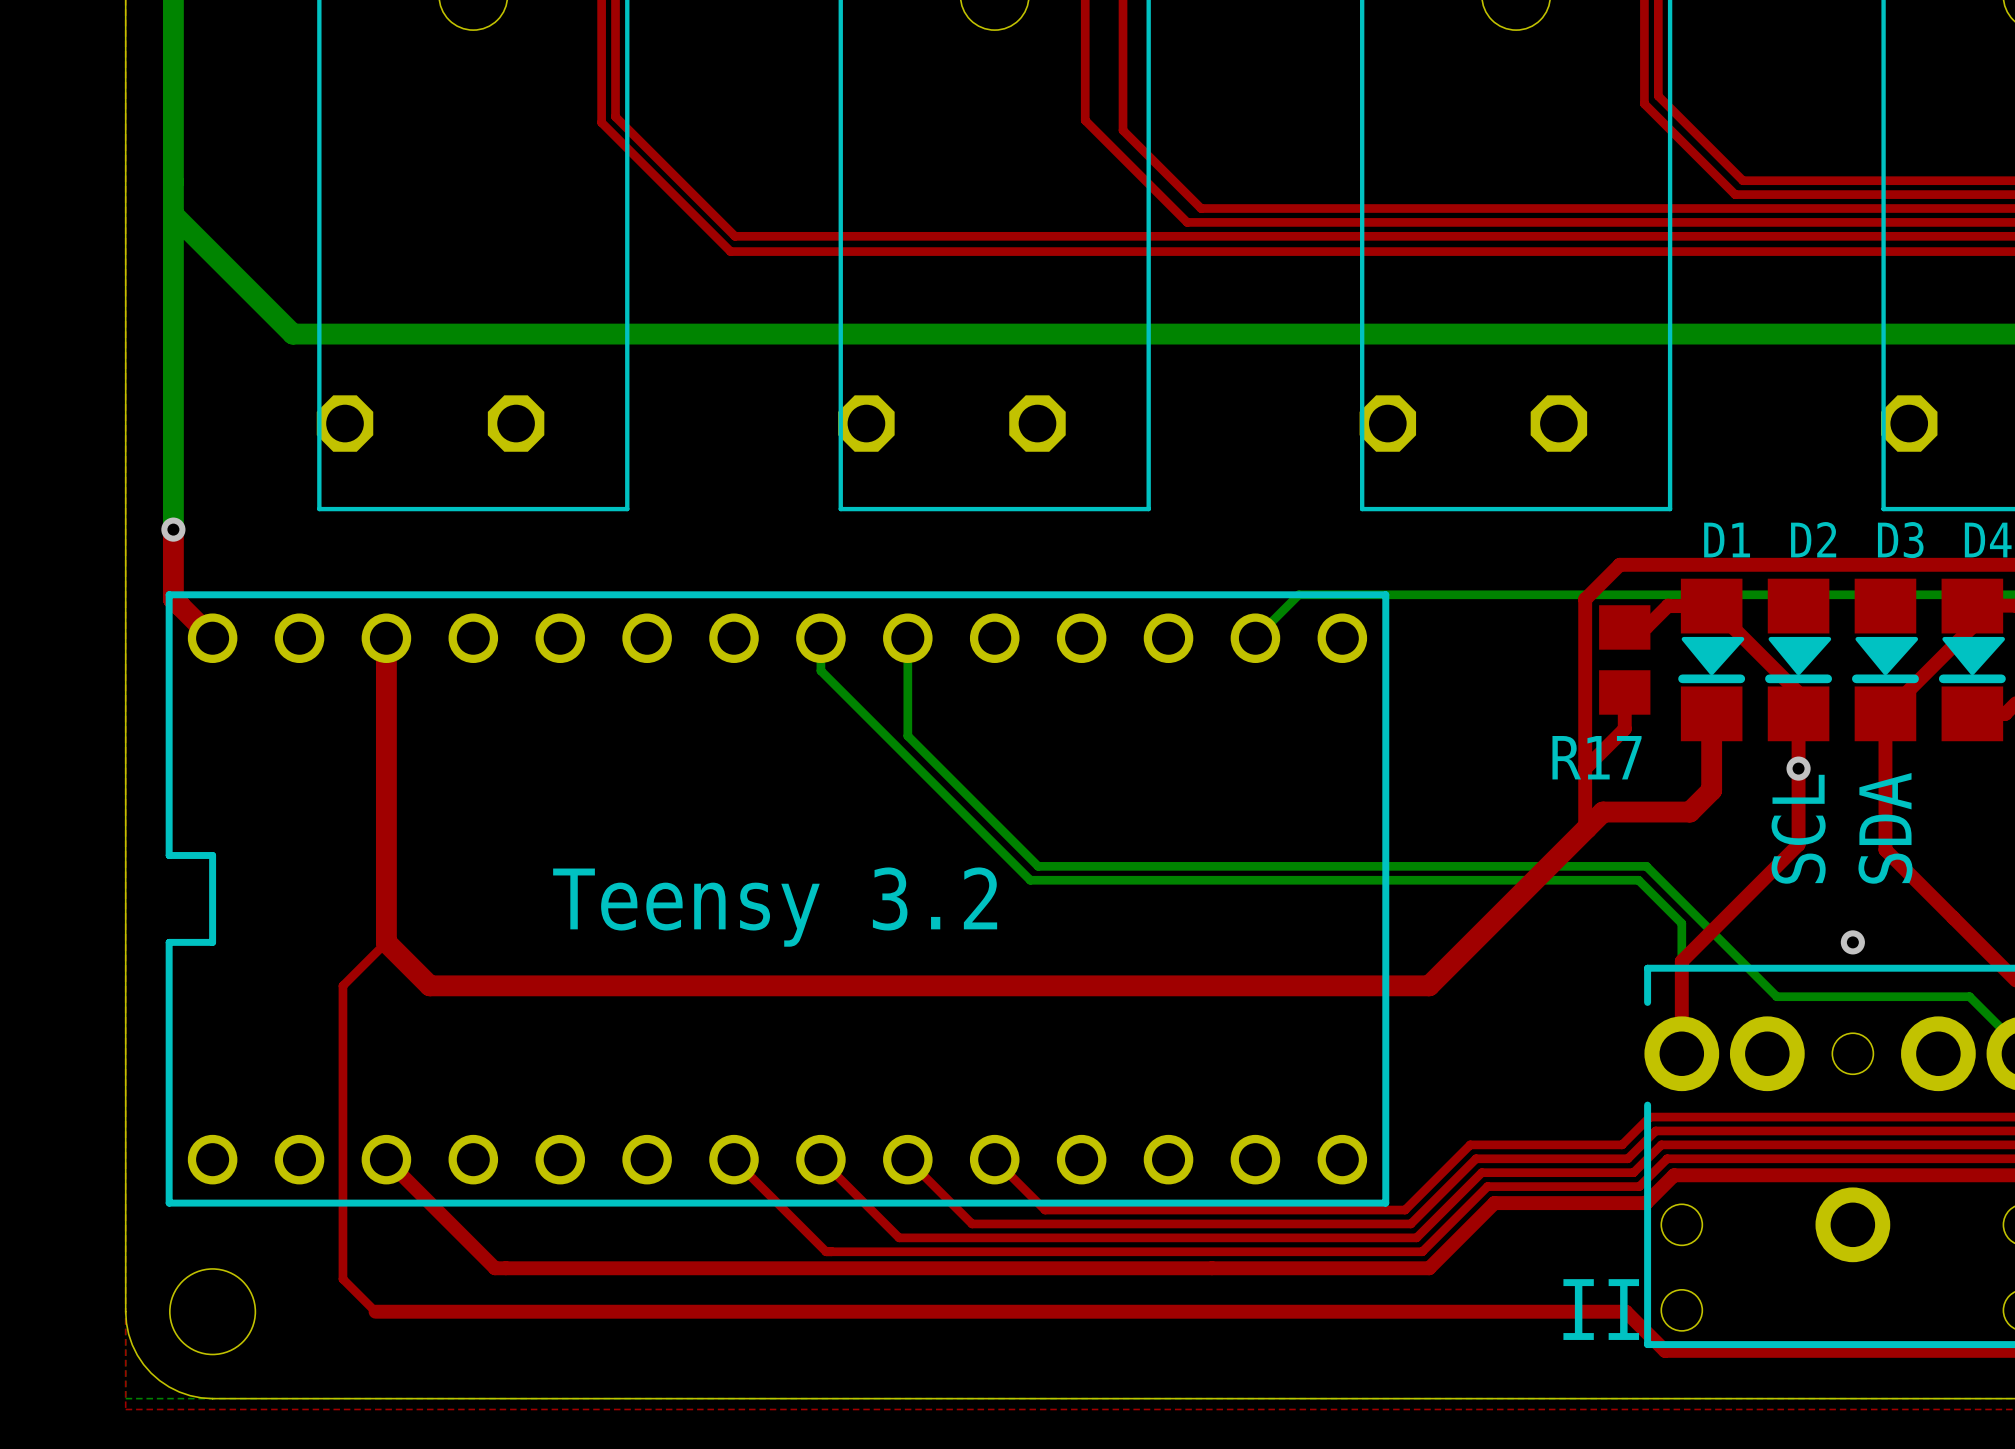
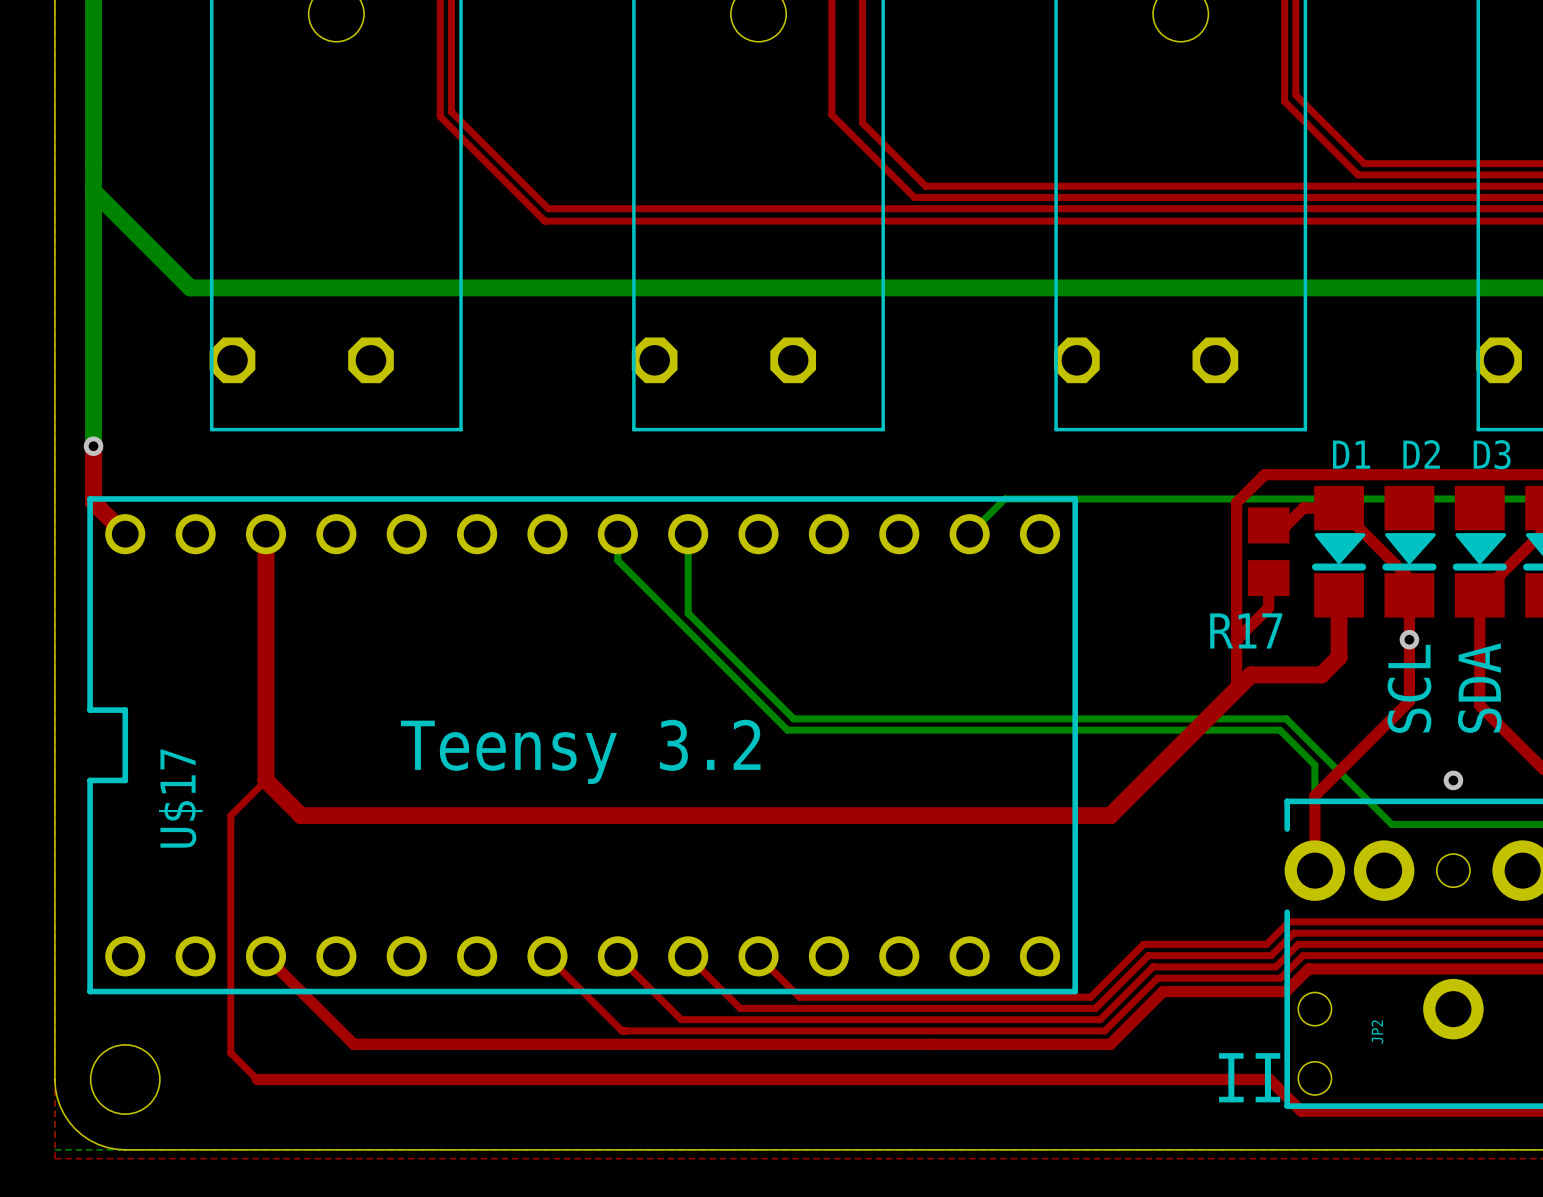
U$17 name: none -> U$17 (180, 798)
JP2 name: none -> JP2 (1377, 1031)

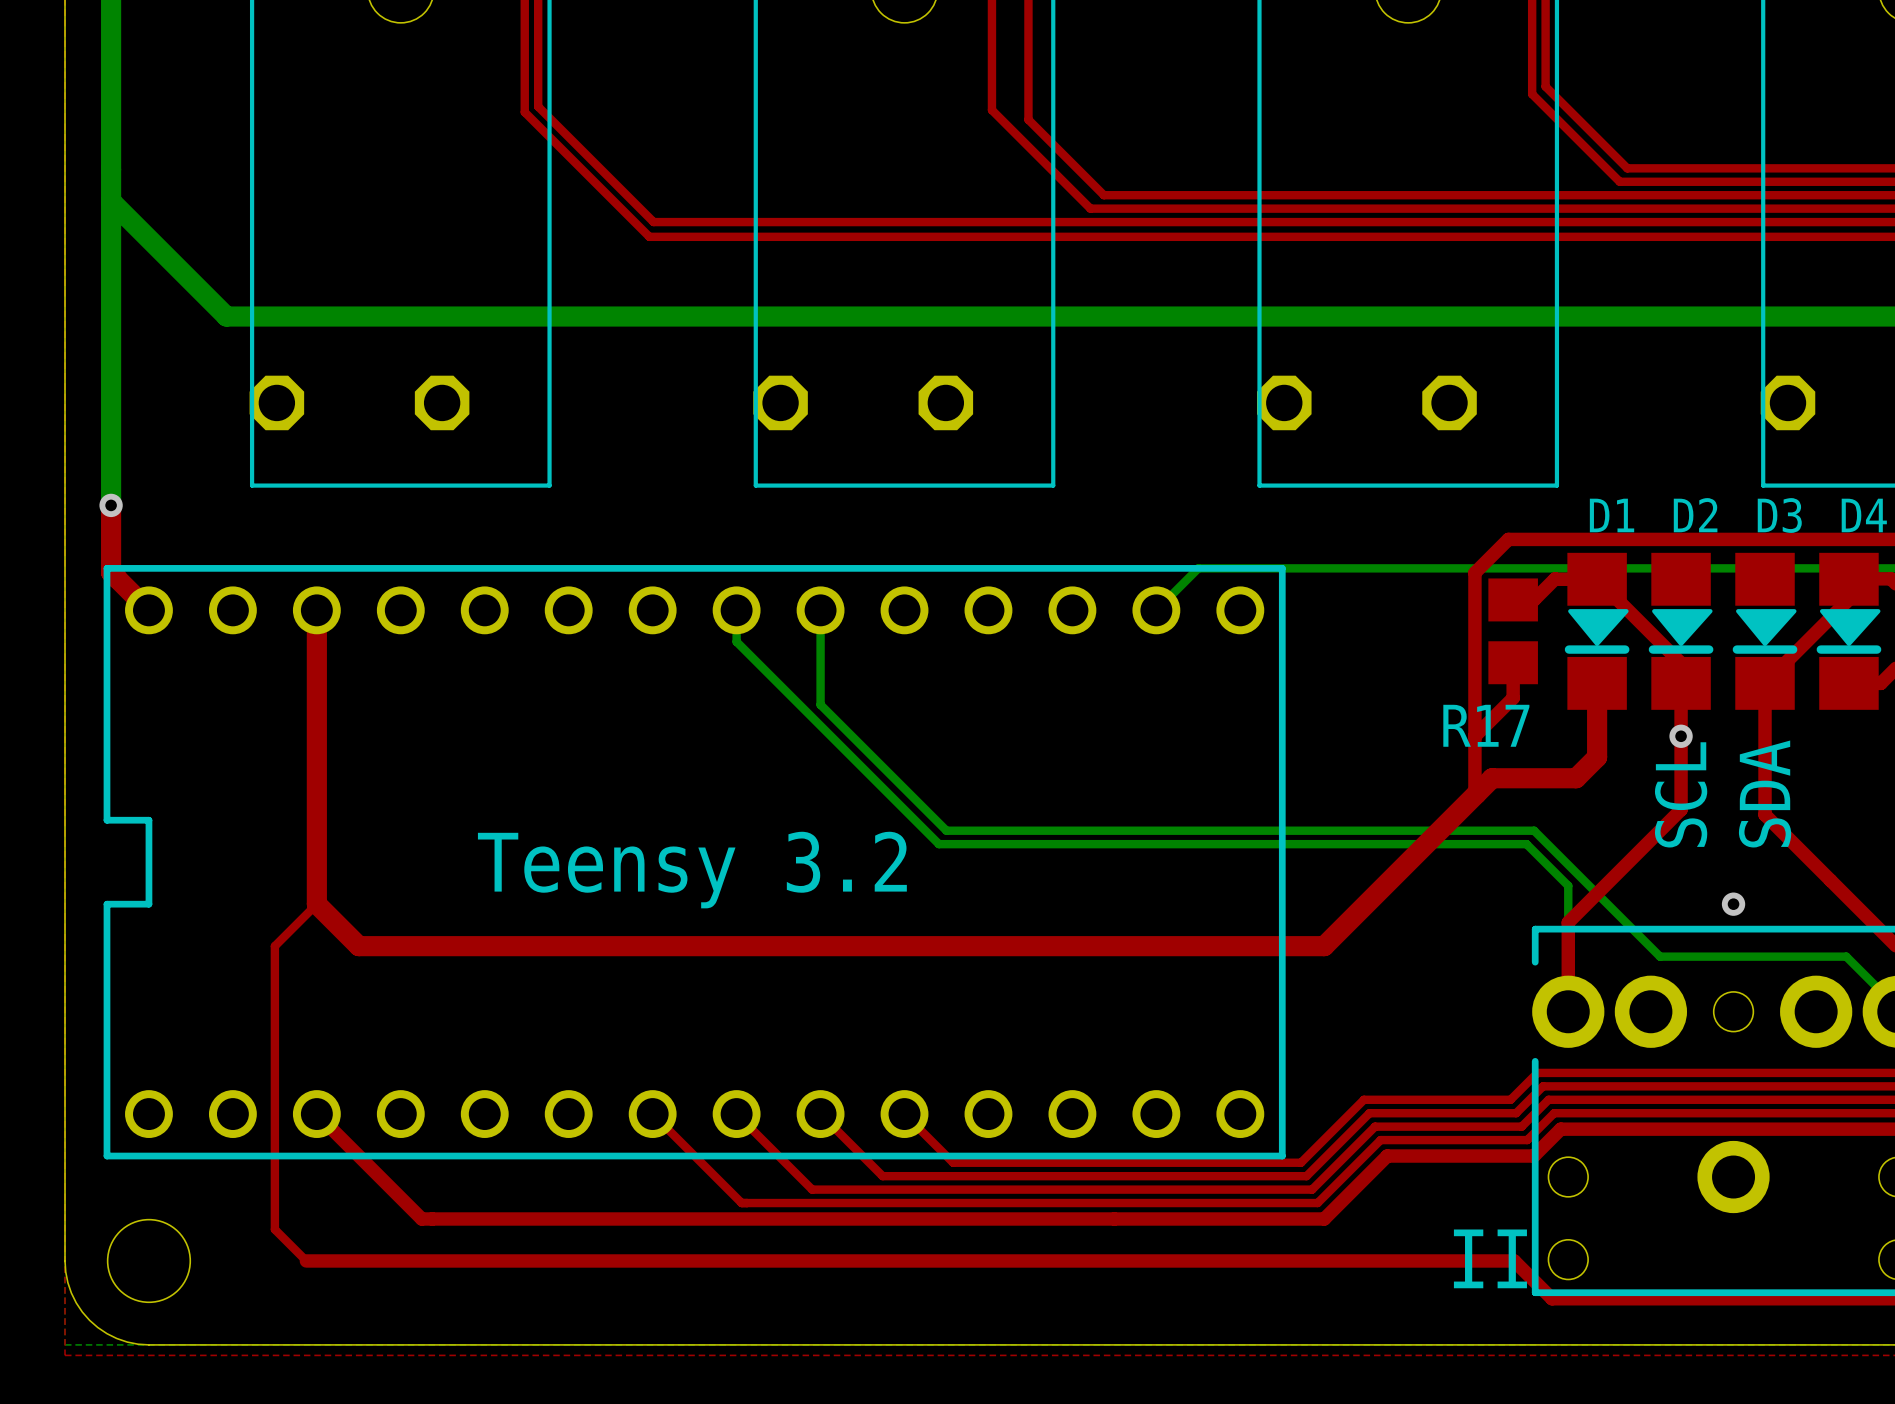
U$17 name: U$17 (180, 798) -> none
JP2 name: JP2 (1377, 1031) -> none

